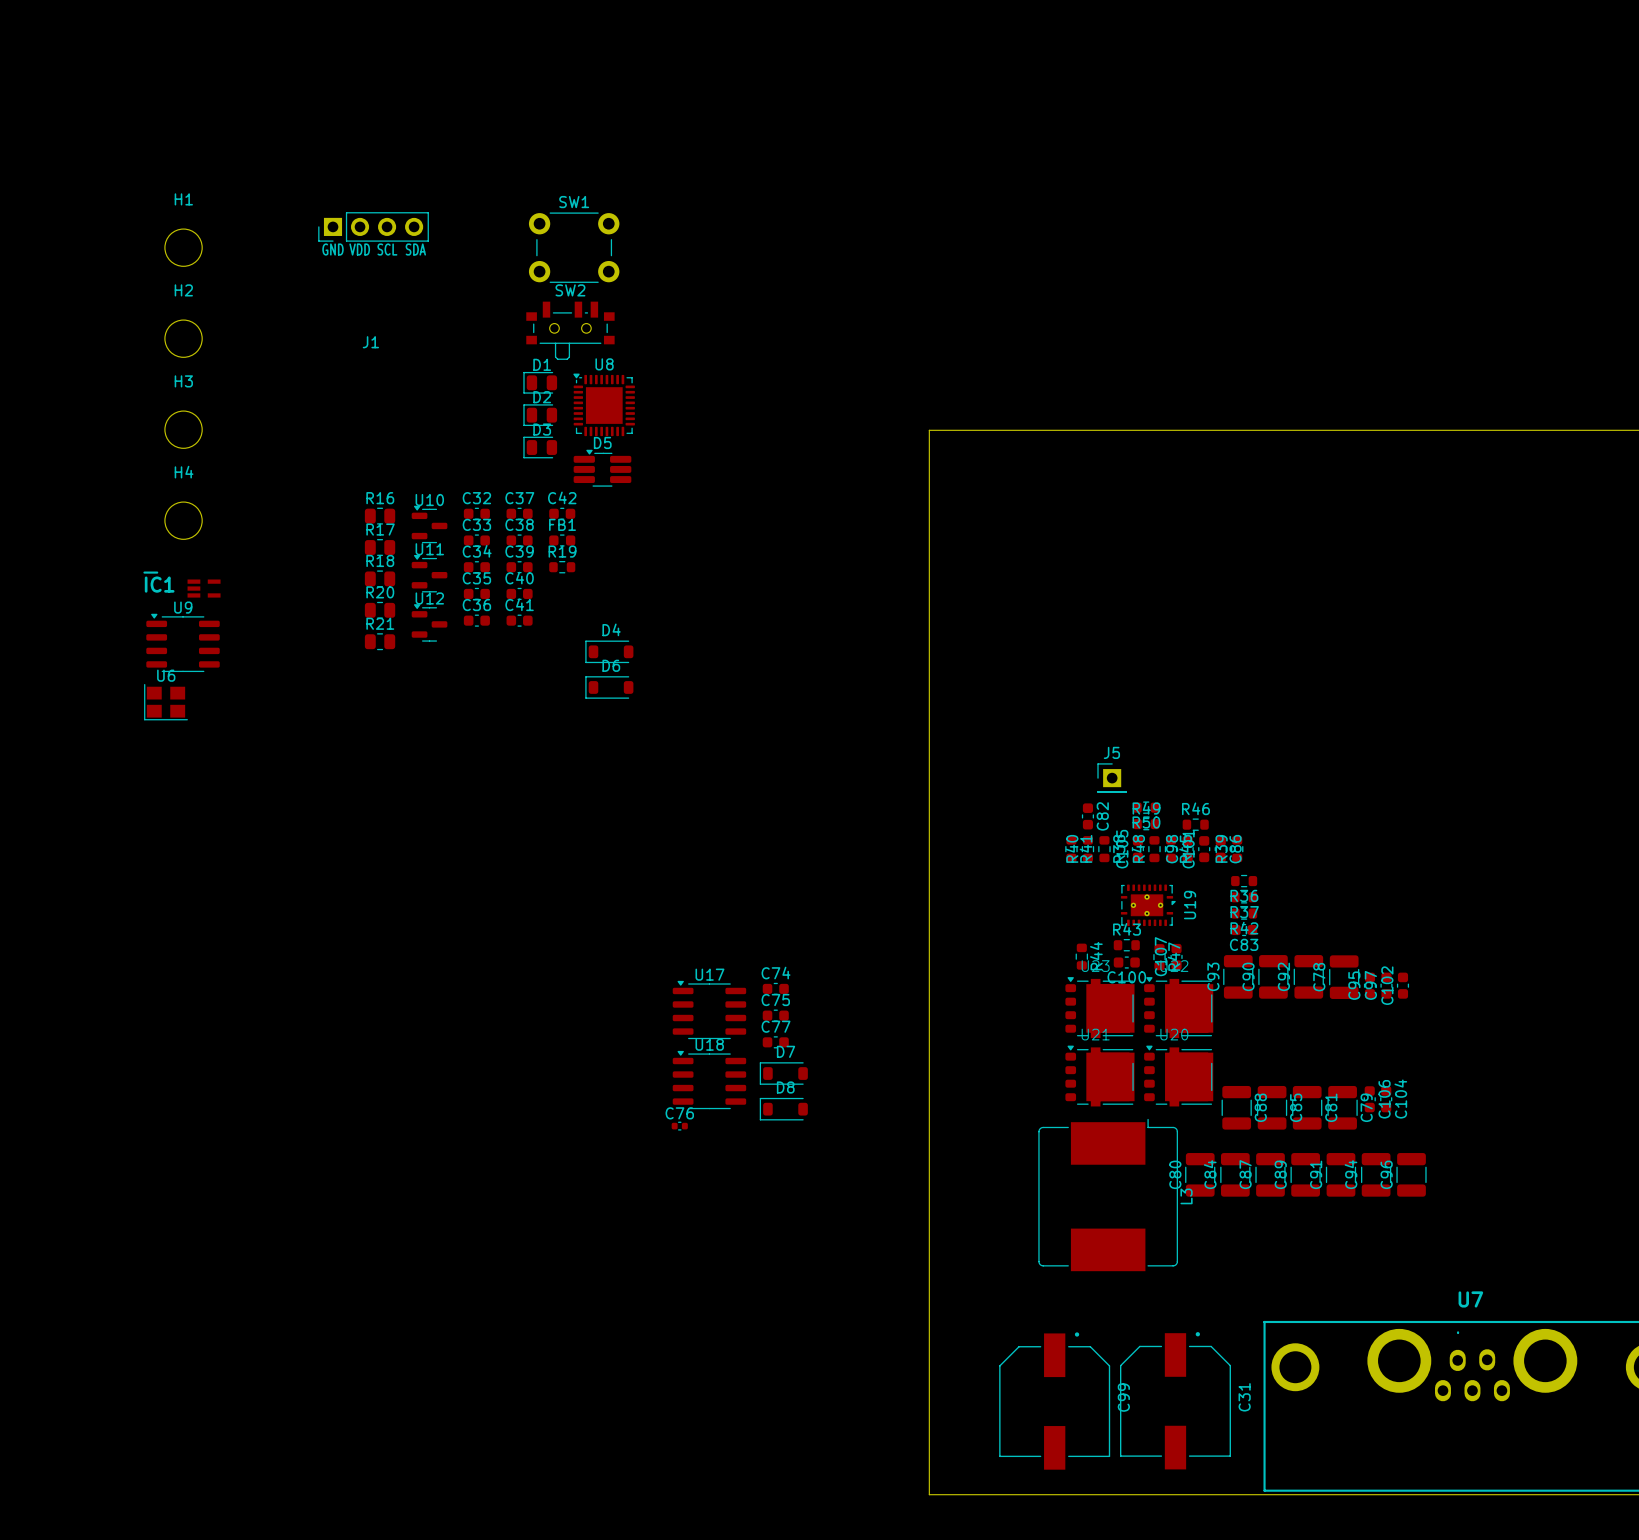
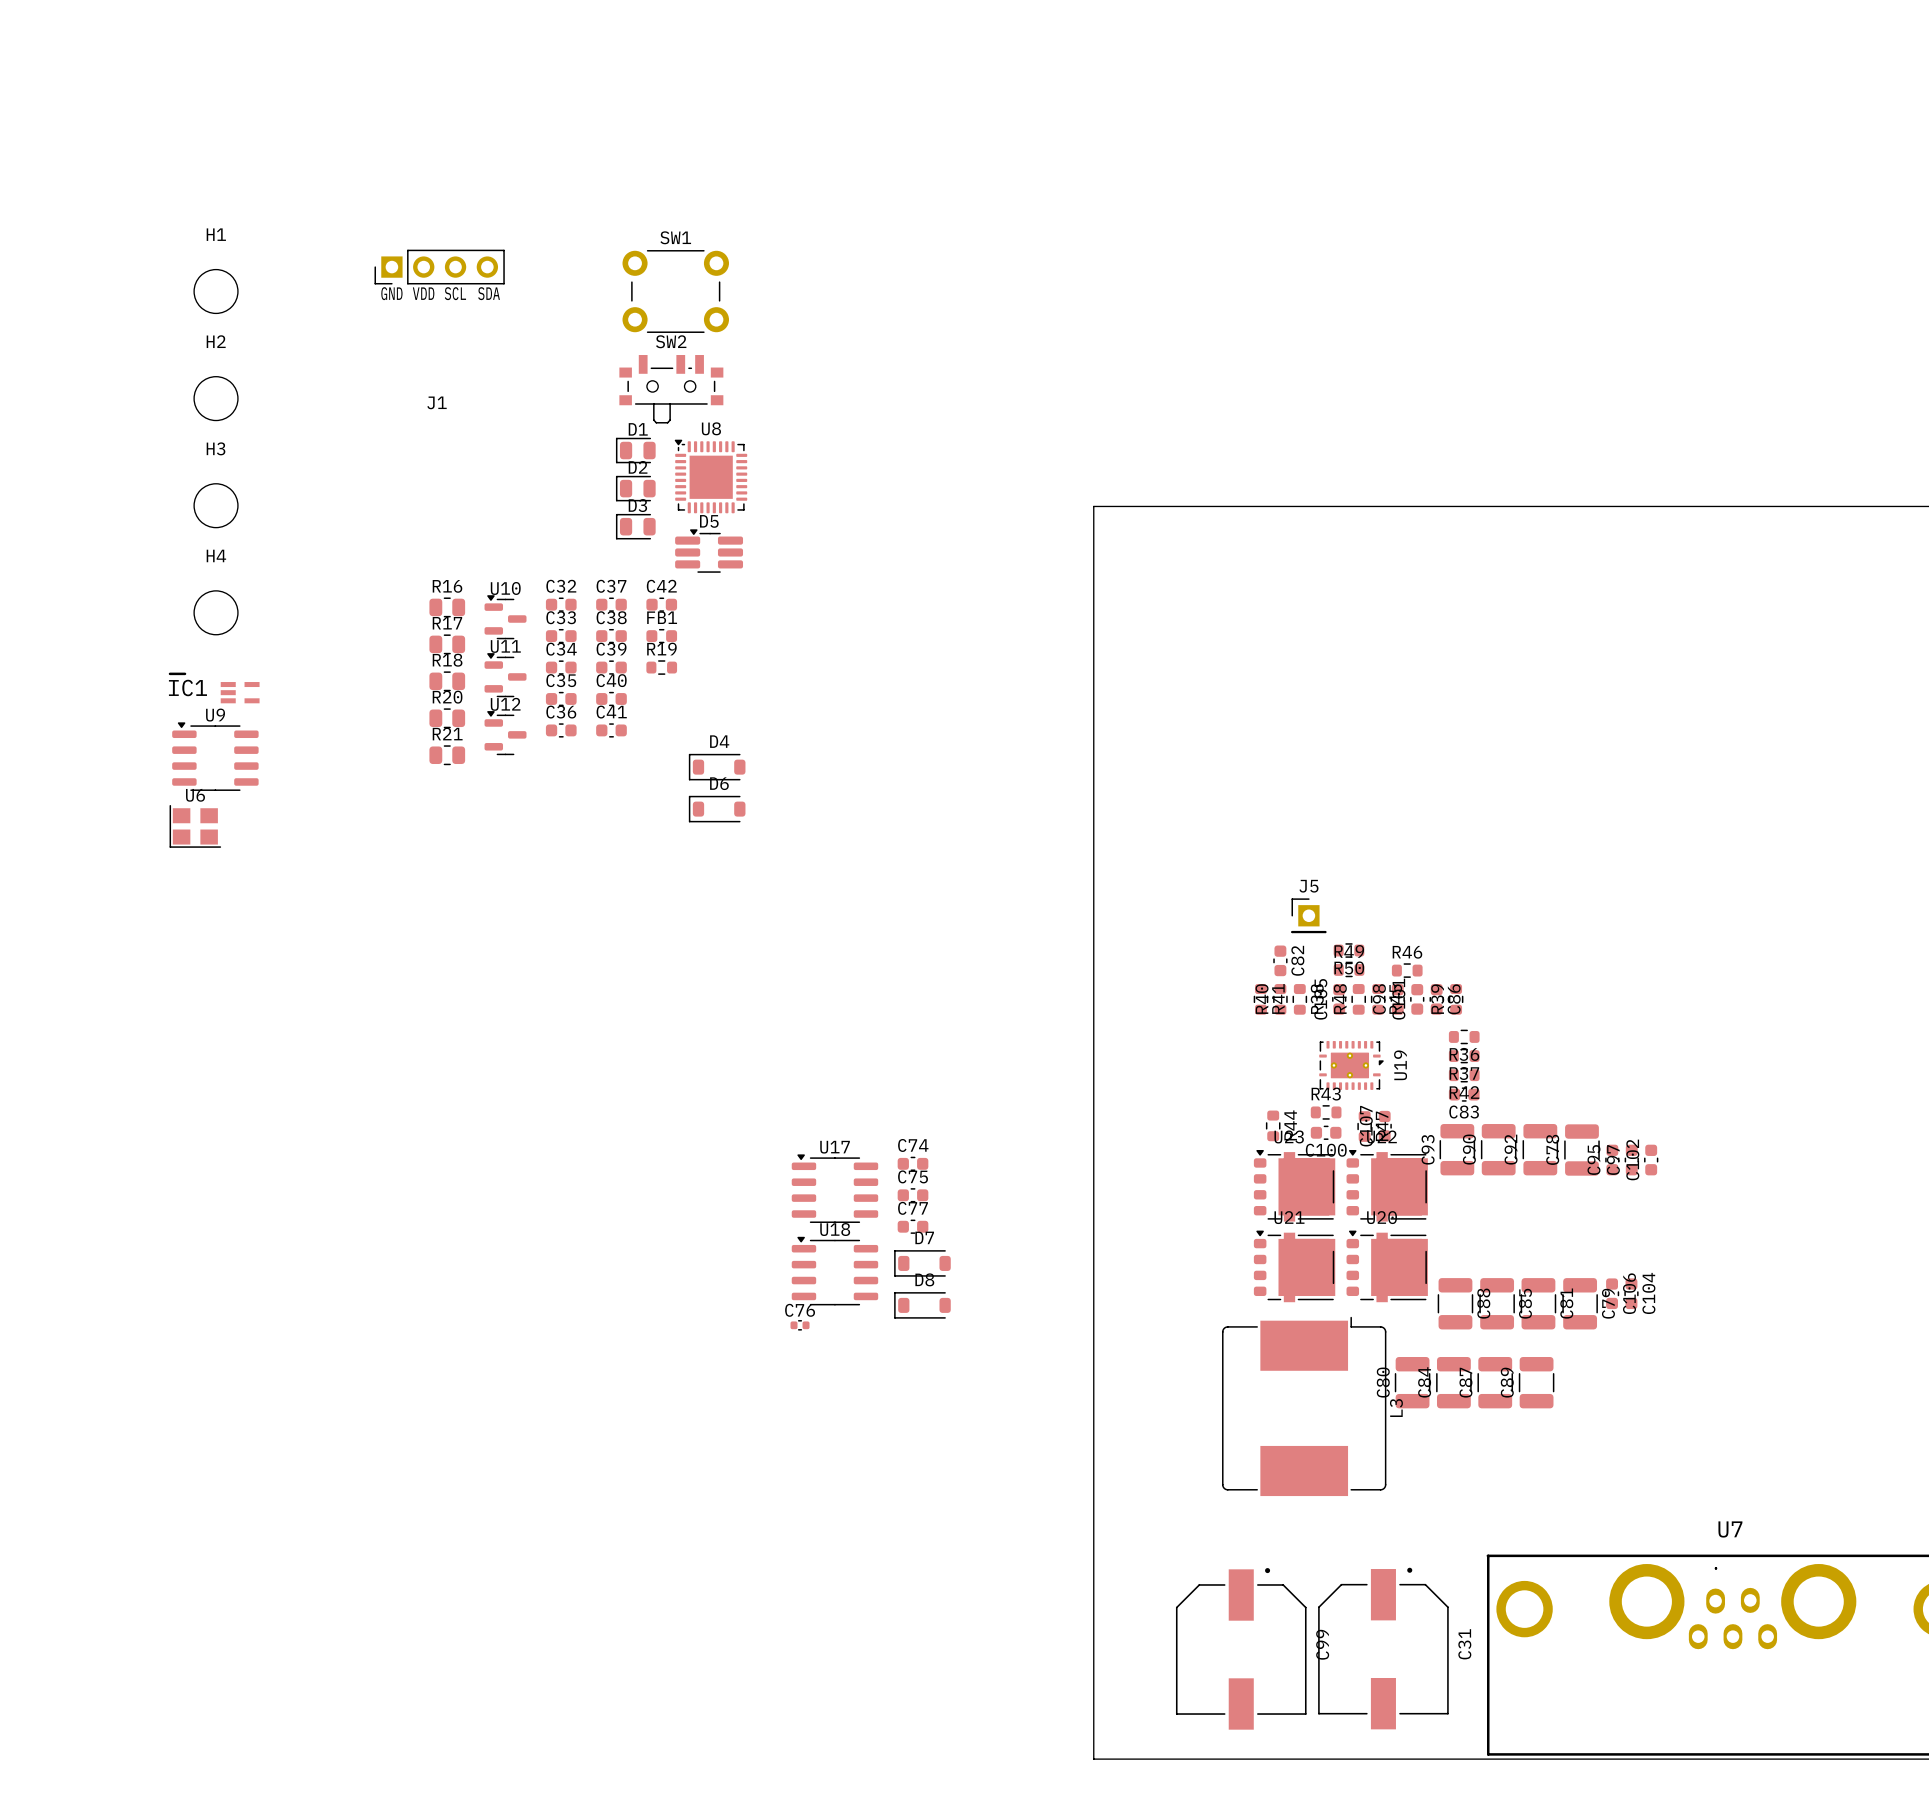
C91: (1340, 1174) -> none
C94: (1376, 1174) -> none
C96: (1411, 1174) -> none

